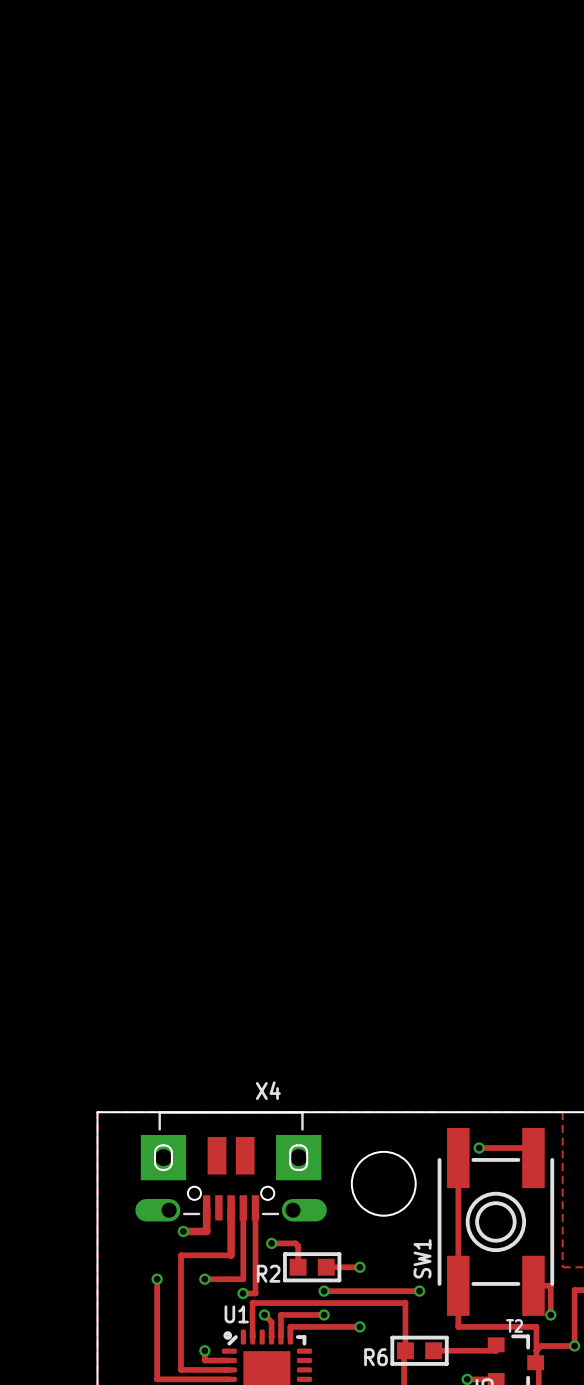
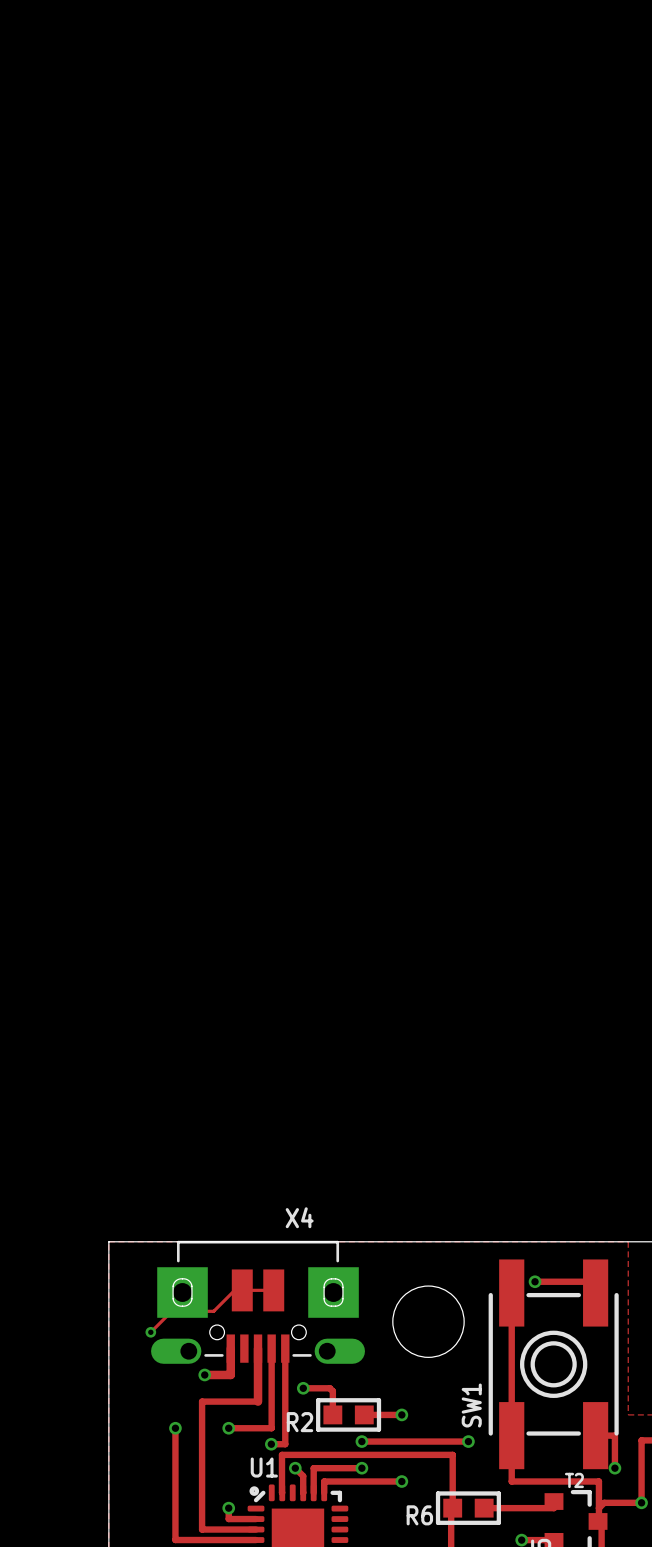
track: none -> (273, 1290) (234, 1290) (213, 1311) (171, 1311) (150, 1332)
via: none -> (150, 1332)

